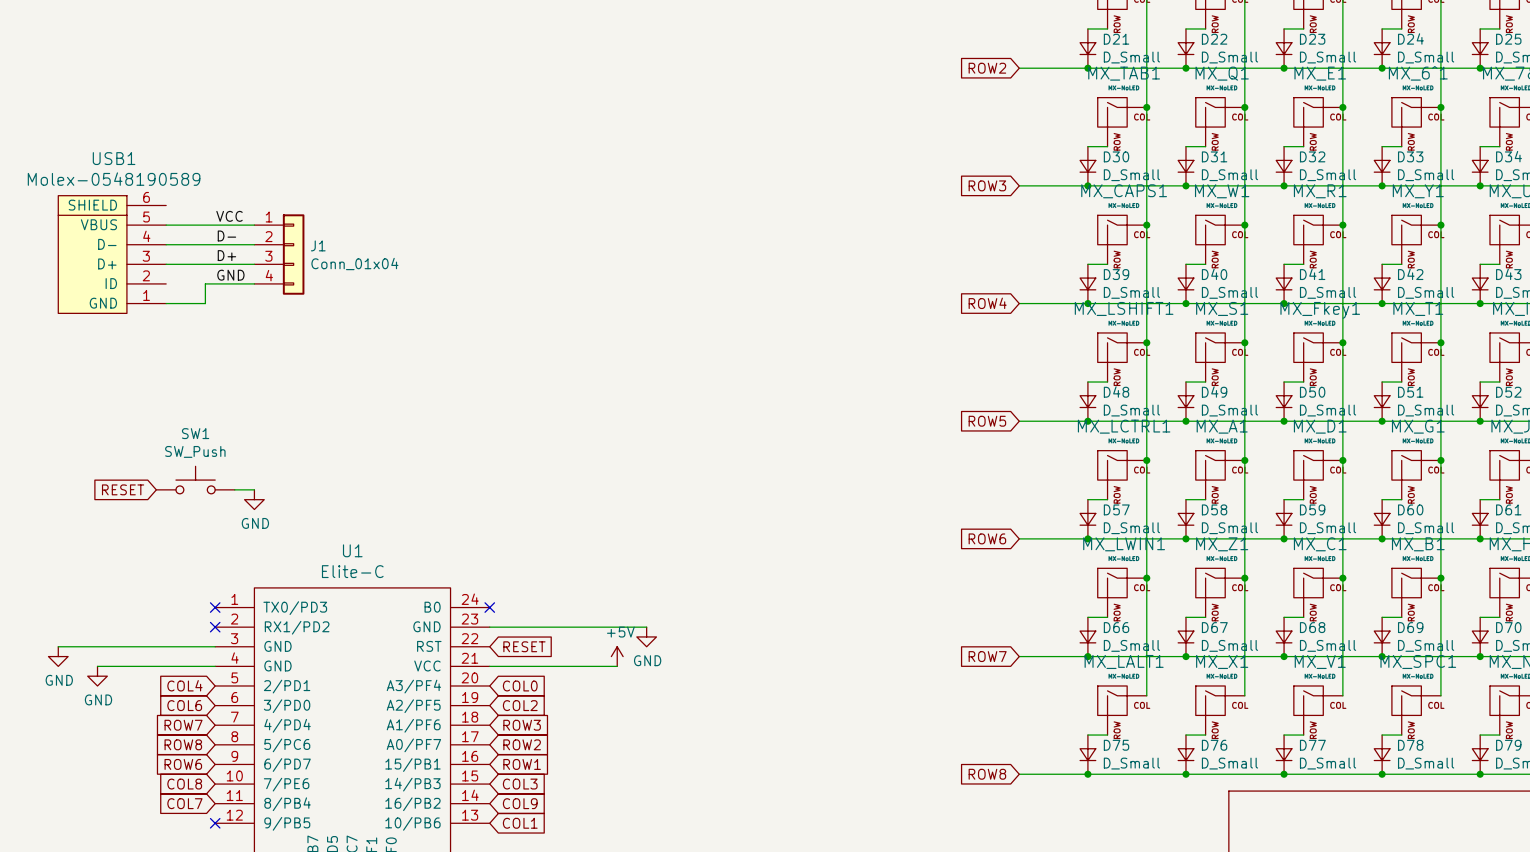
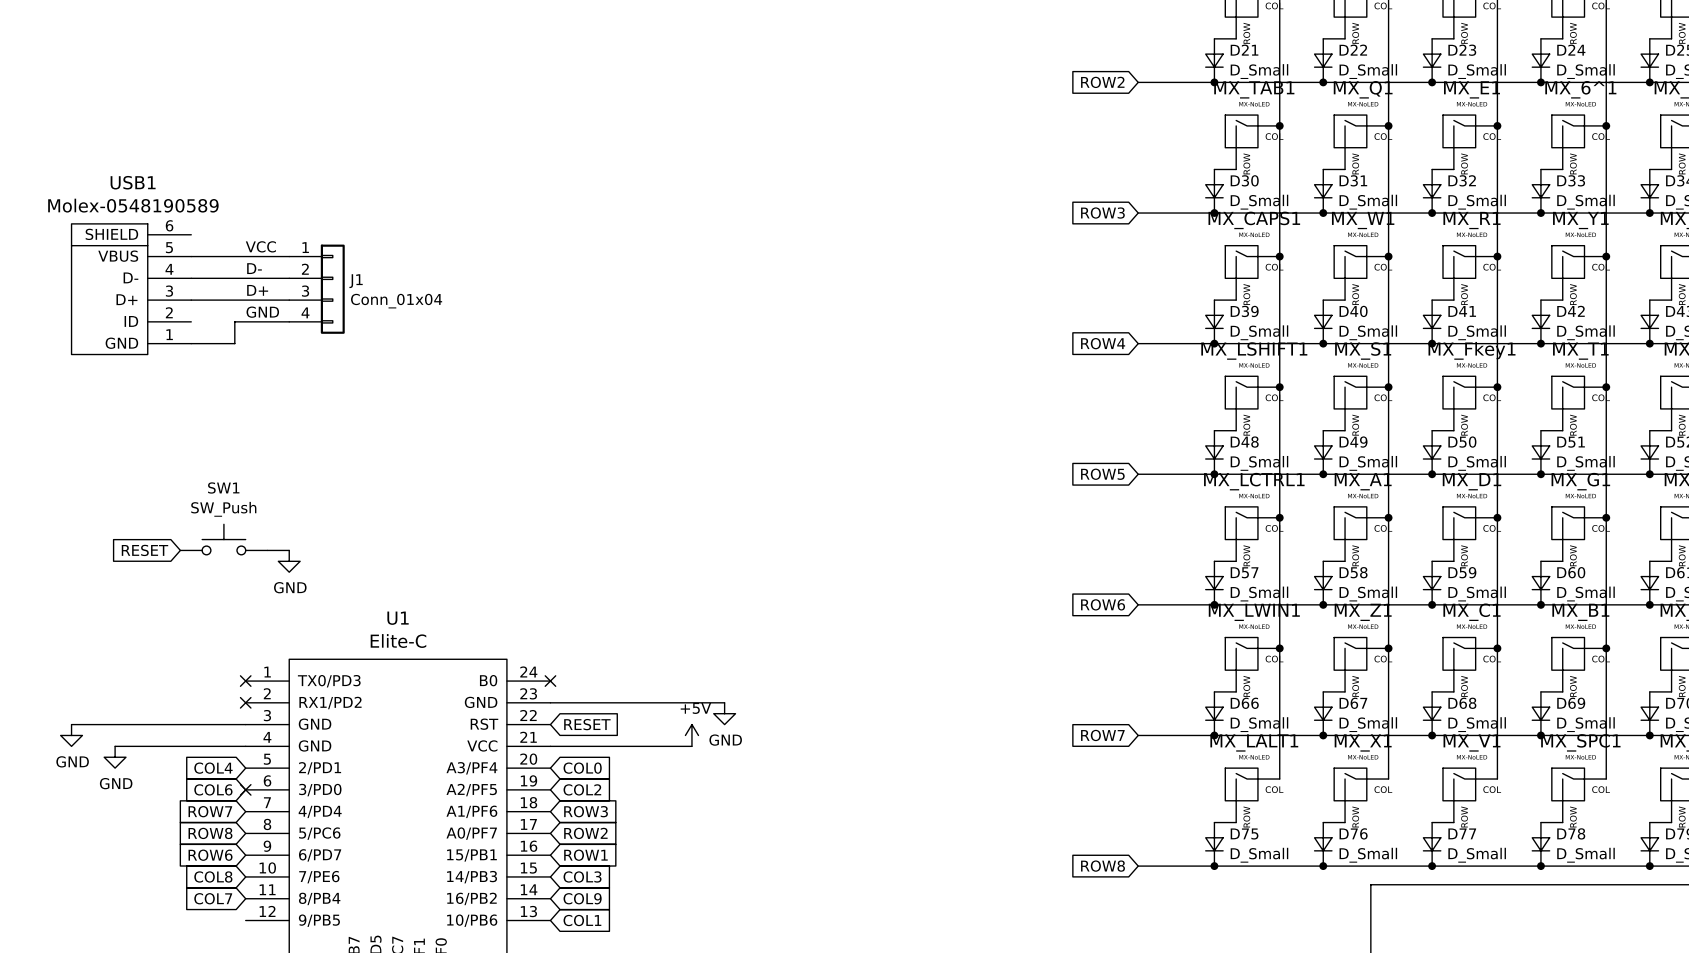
no-connect mark: none -> (245, 789)
no-connect mark: (215, 823) -> none

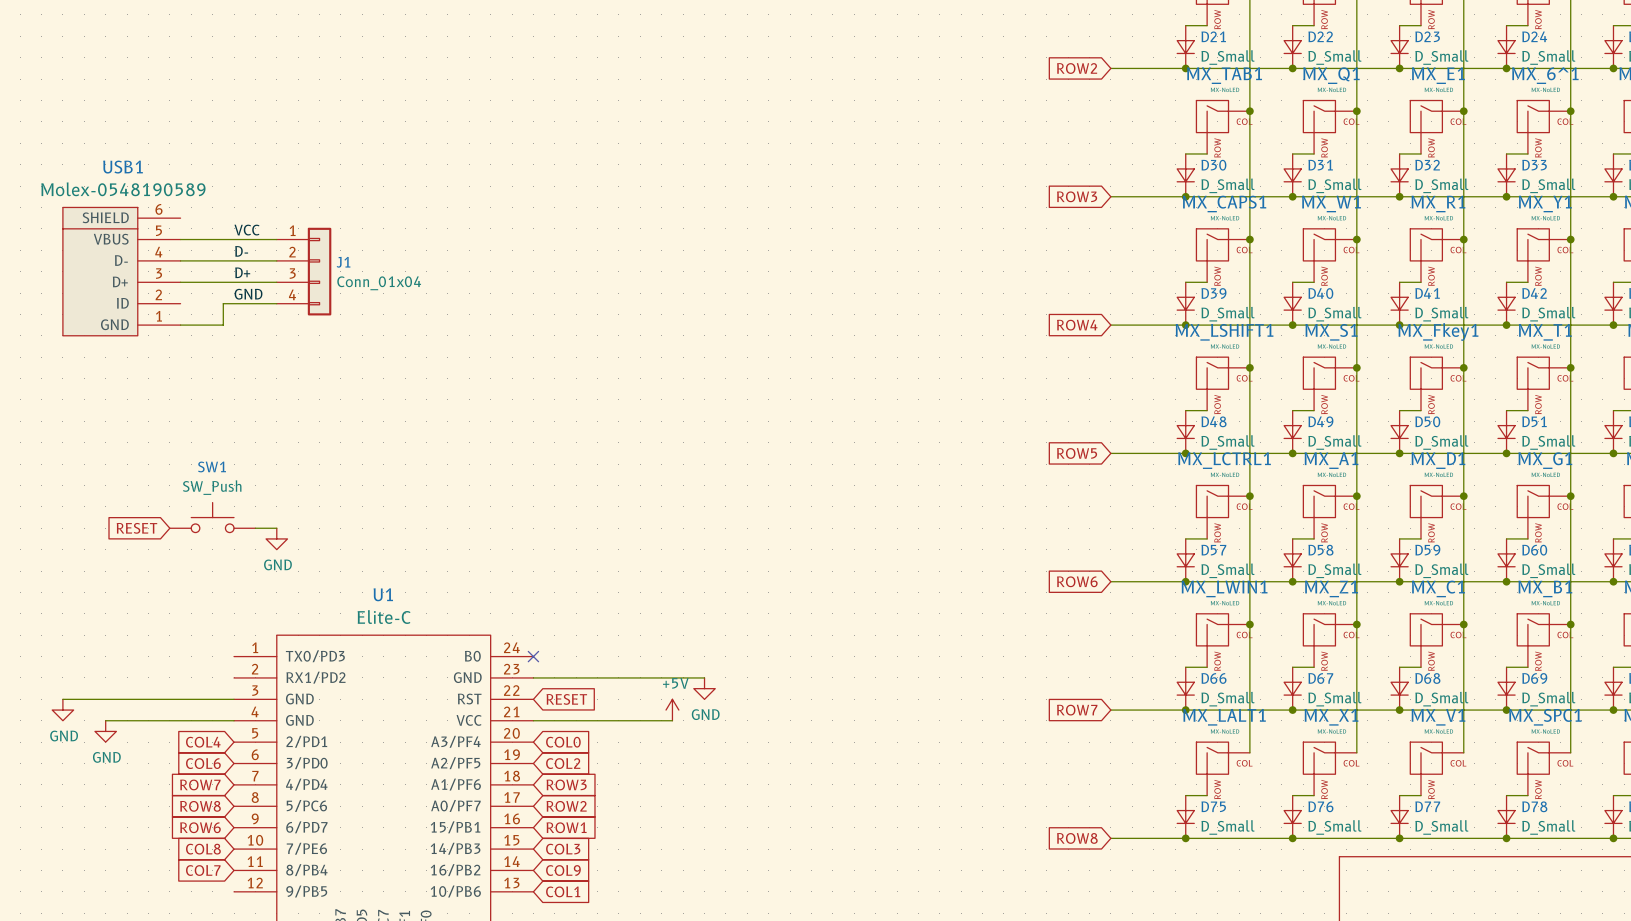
no-connect mark: (245, 681) -> none
no-connect mark: (245, 702) -> none
no-connect mark: (245, 789) -> none

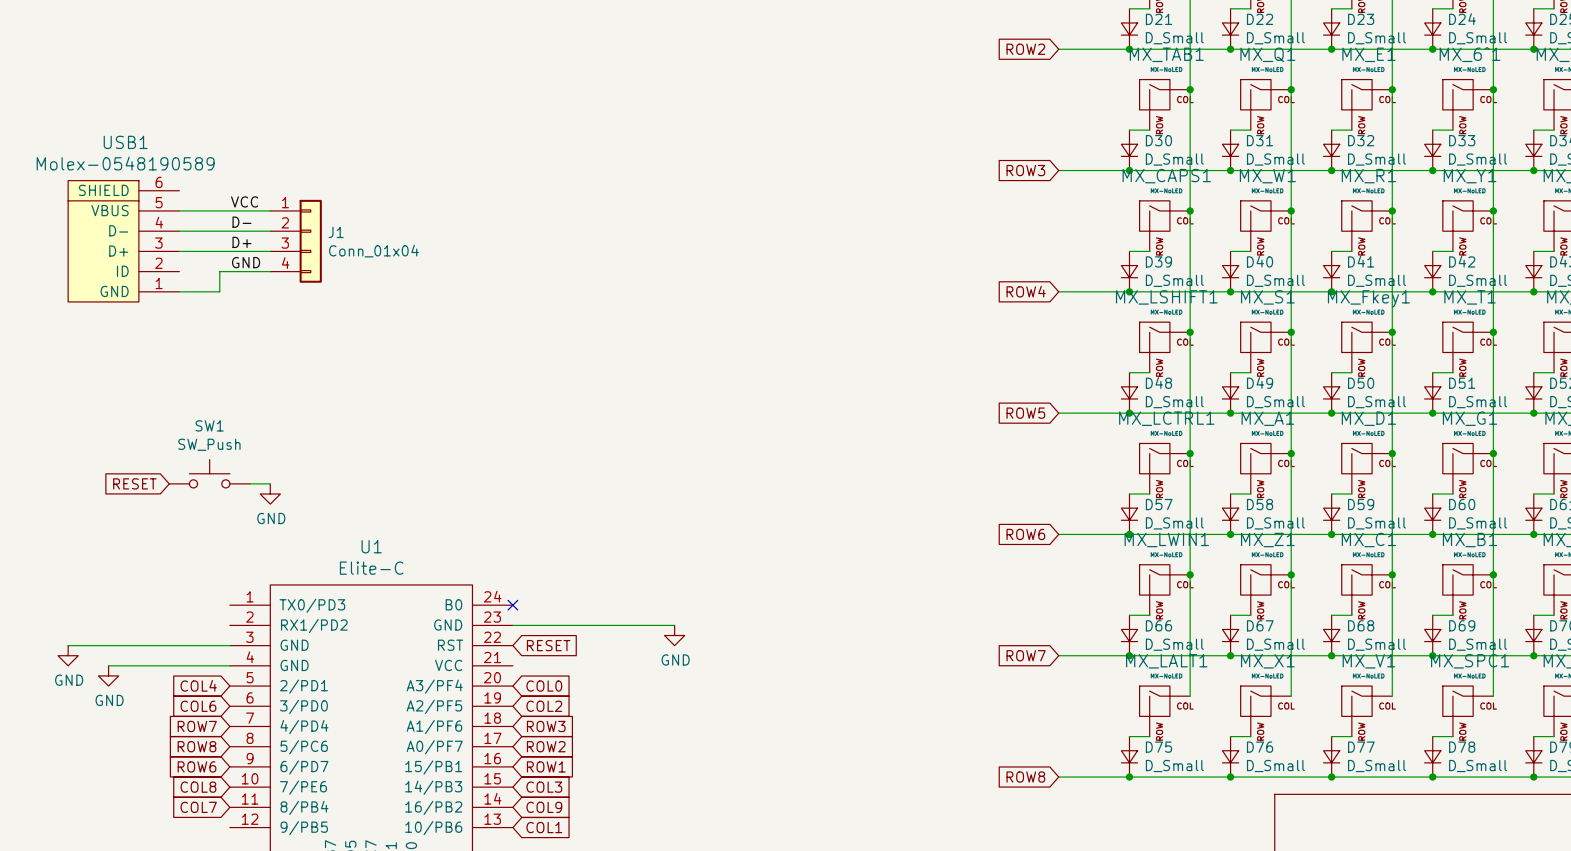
power symbol: +5V (672, 710) -> none
wire: (533, 720) (672, 720) -> none

